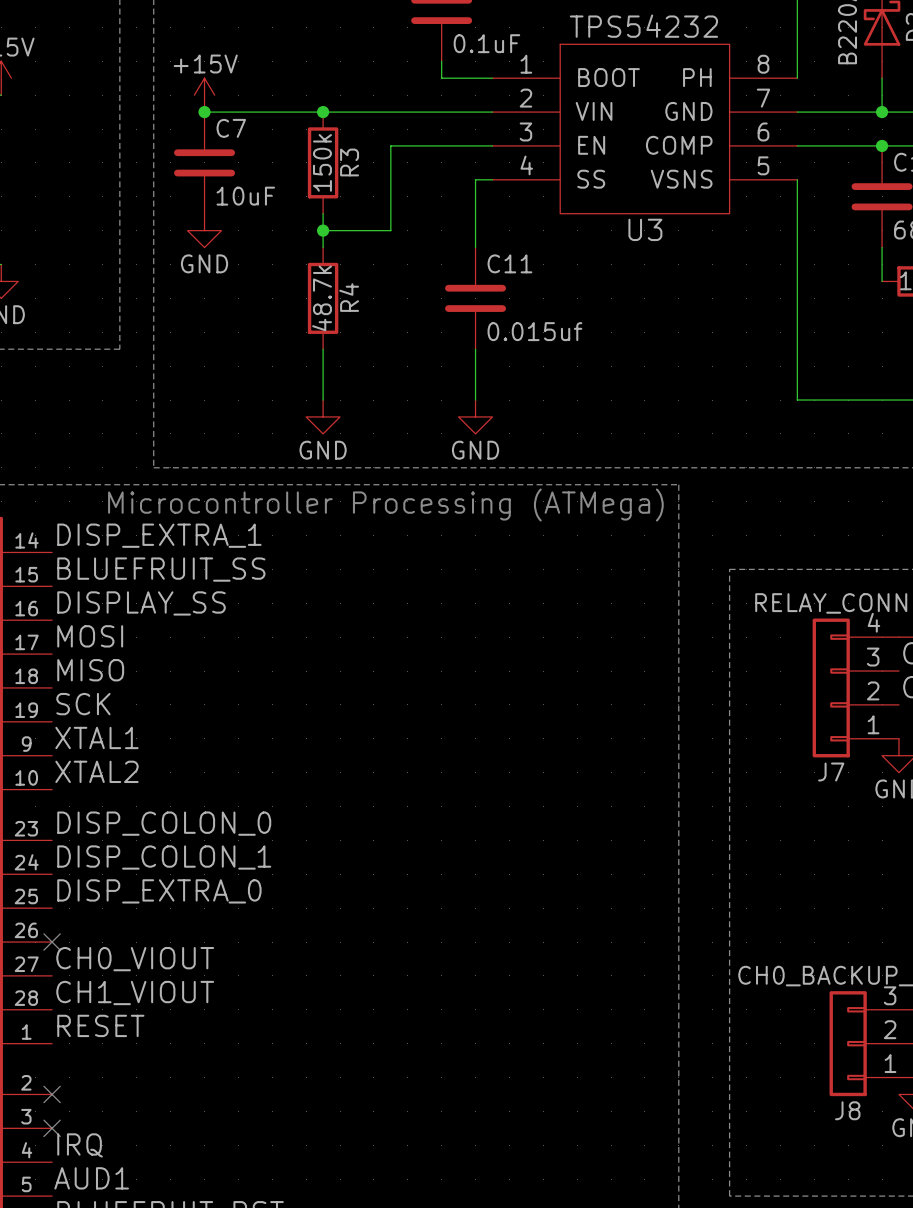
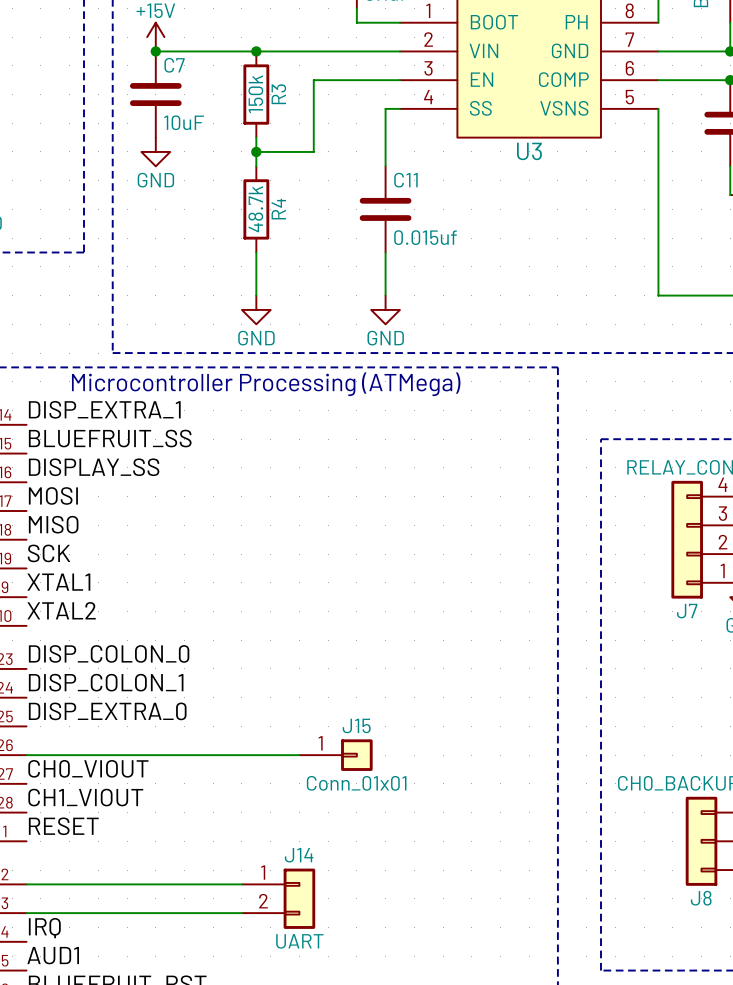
wire: none -> (26, 755) (299, 755)
no-connect mark: (52, 942) -> none
J15: none -> Conn_01x01 (336, 755)
wire: none -> (26, 884) (241, 884)
no-connect mark: (52, 1094) -> none
J14: none -> UART (278, 898)
wire: none -> (26, 913) (241, 913)
no-connect mark: (52, 1128) -> none

